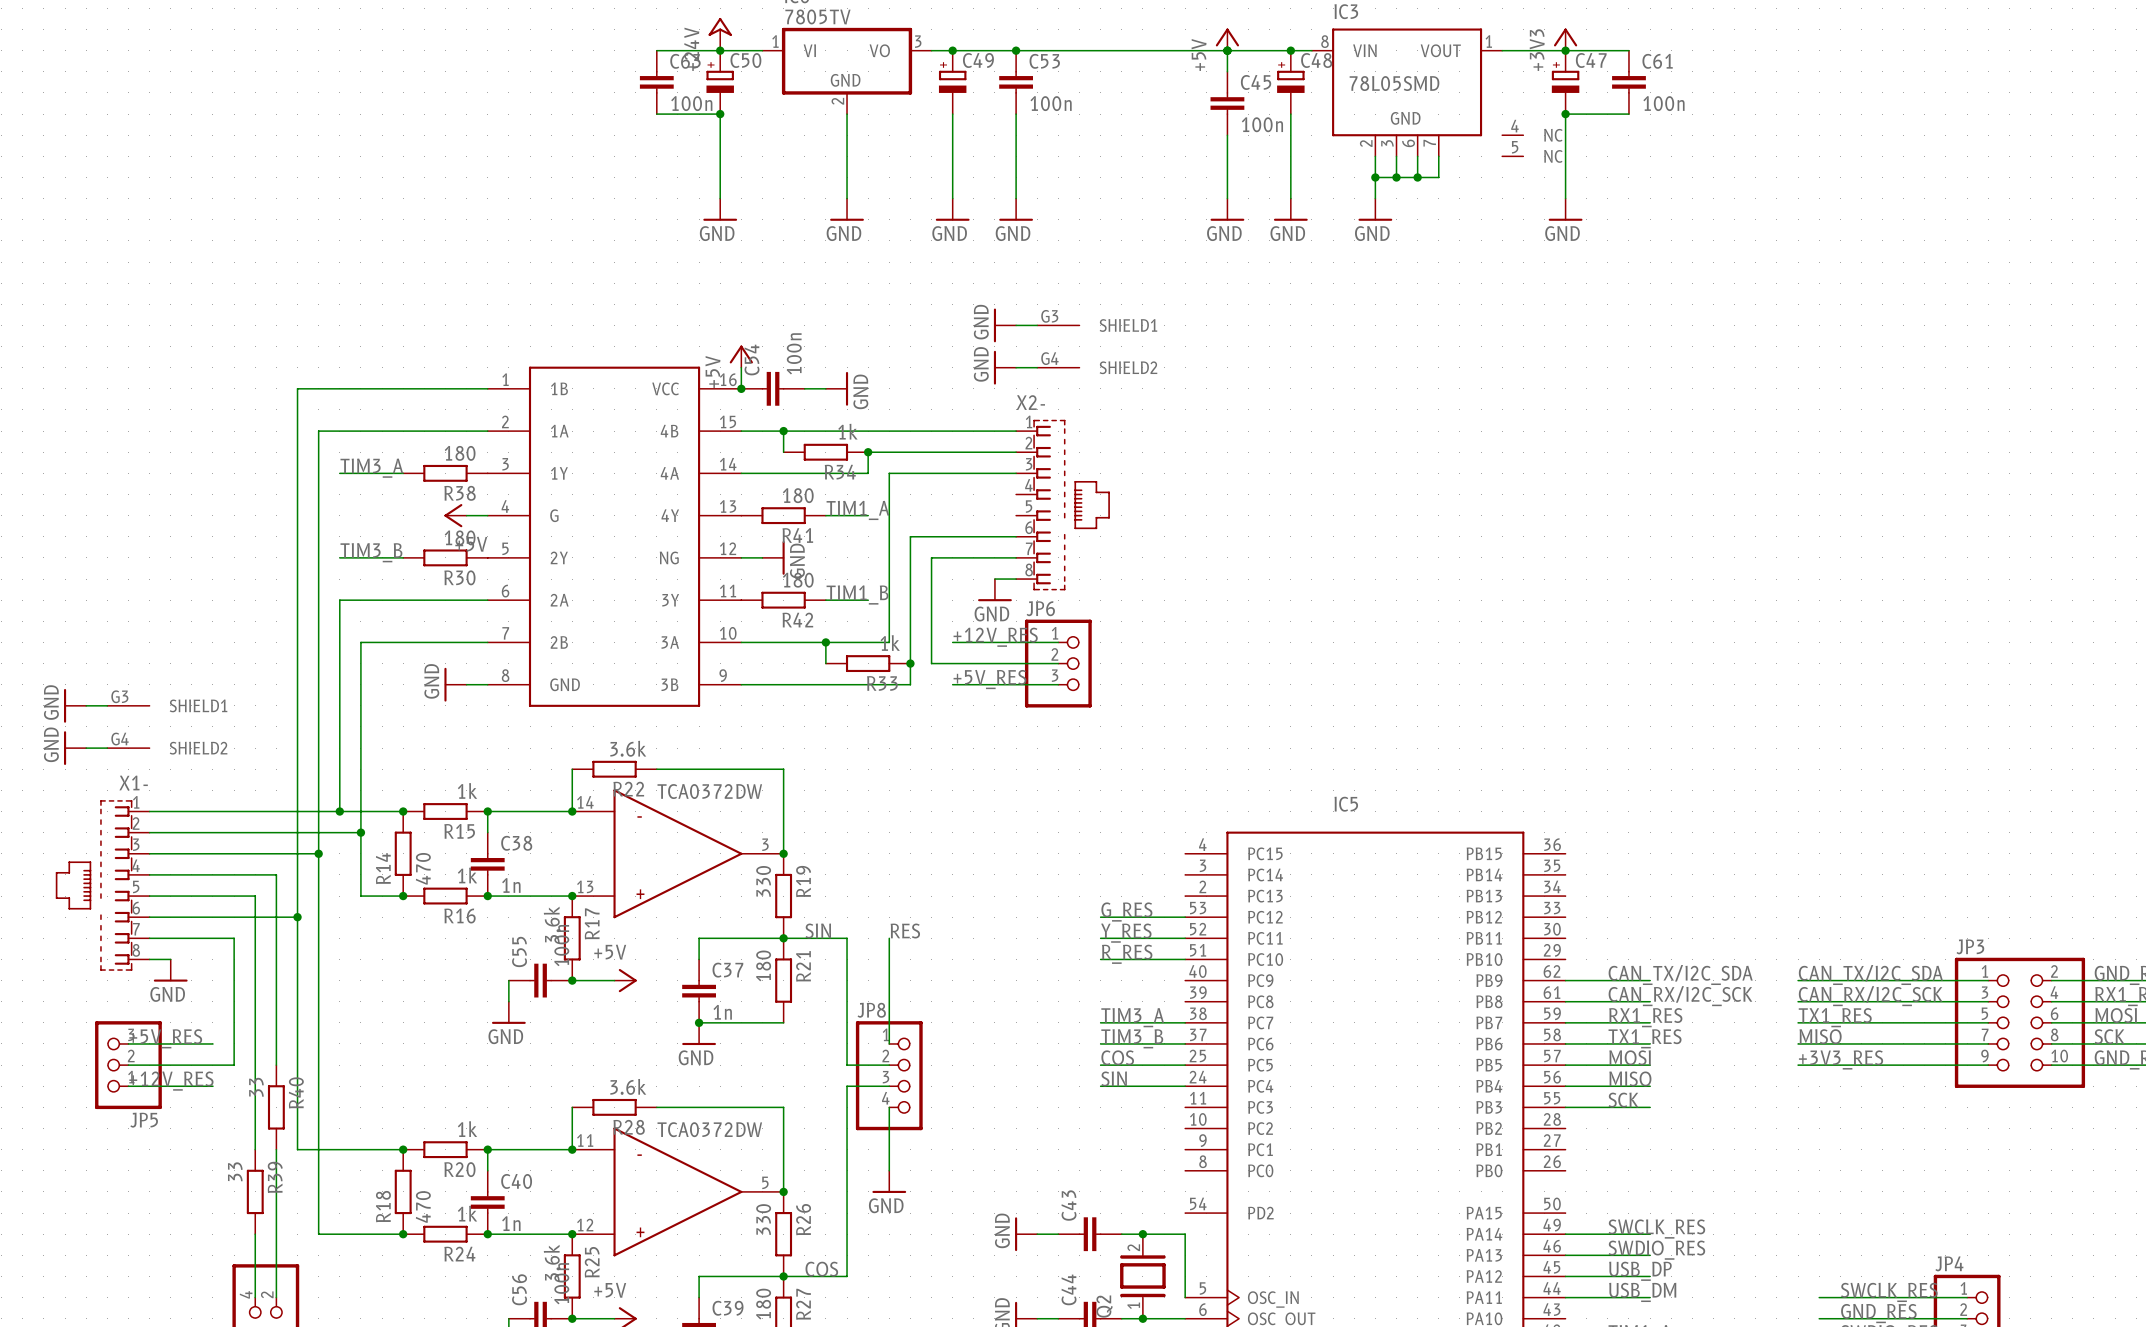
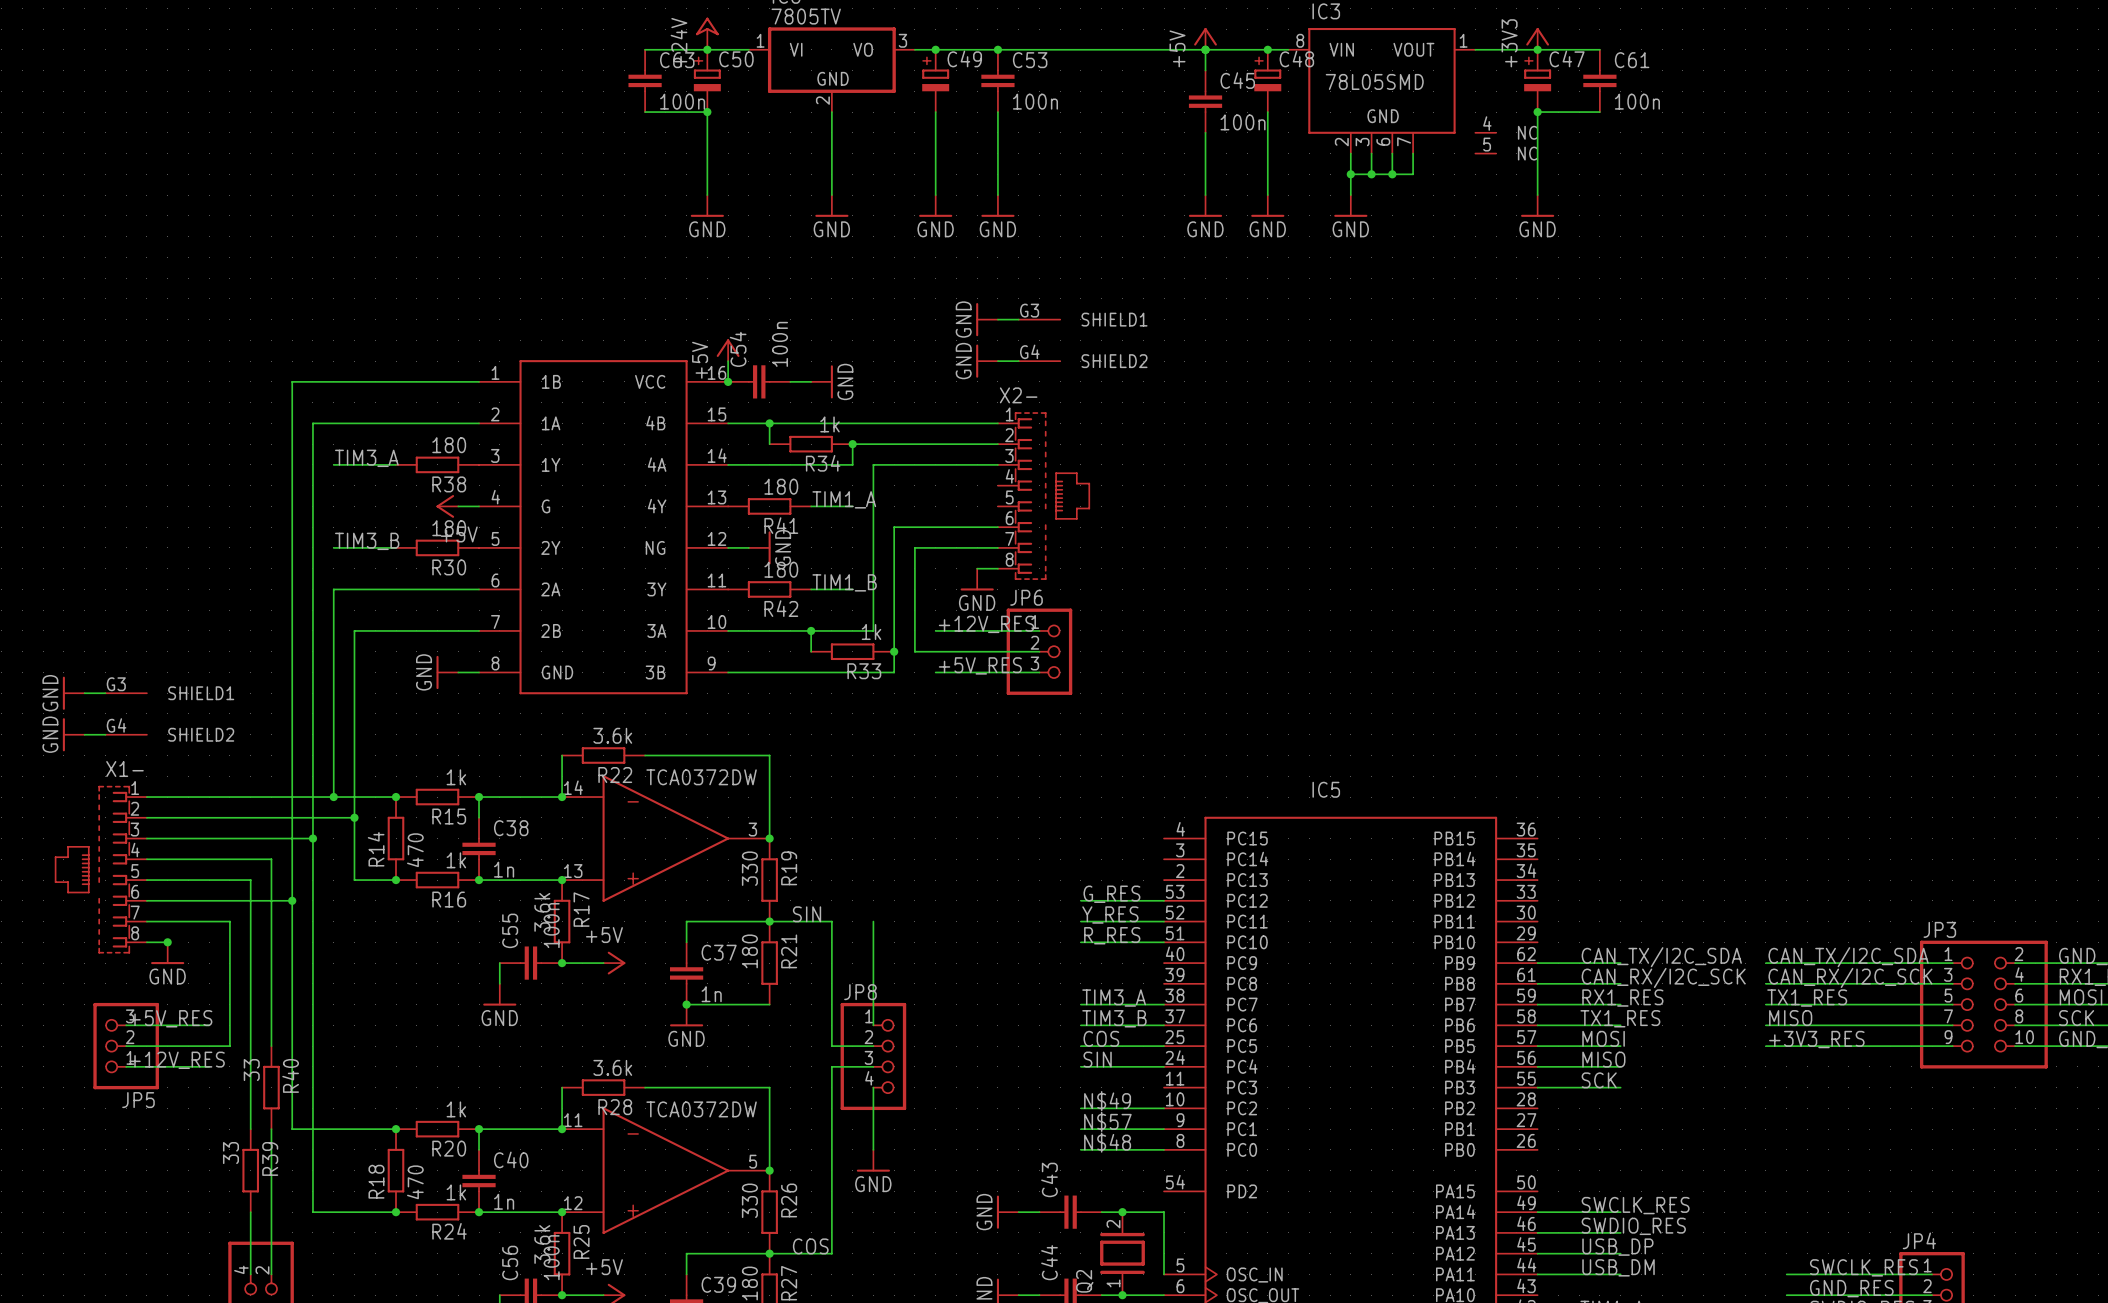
label: RES (905, 931) -> none
junction: none -> (167, 942)
label: none -> N$49 (1107, 1101)
wire: none -> (1080, 1108) (1164, 1108)
label: none -> N$57 (1107, 1121)
wire: none -> (1080, 1129) (1164, 1129)
label: none -> N$48 (1107, 1142)
wire: none -> (1080, 1149) (1164, 1149)

